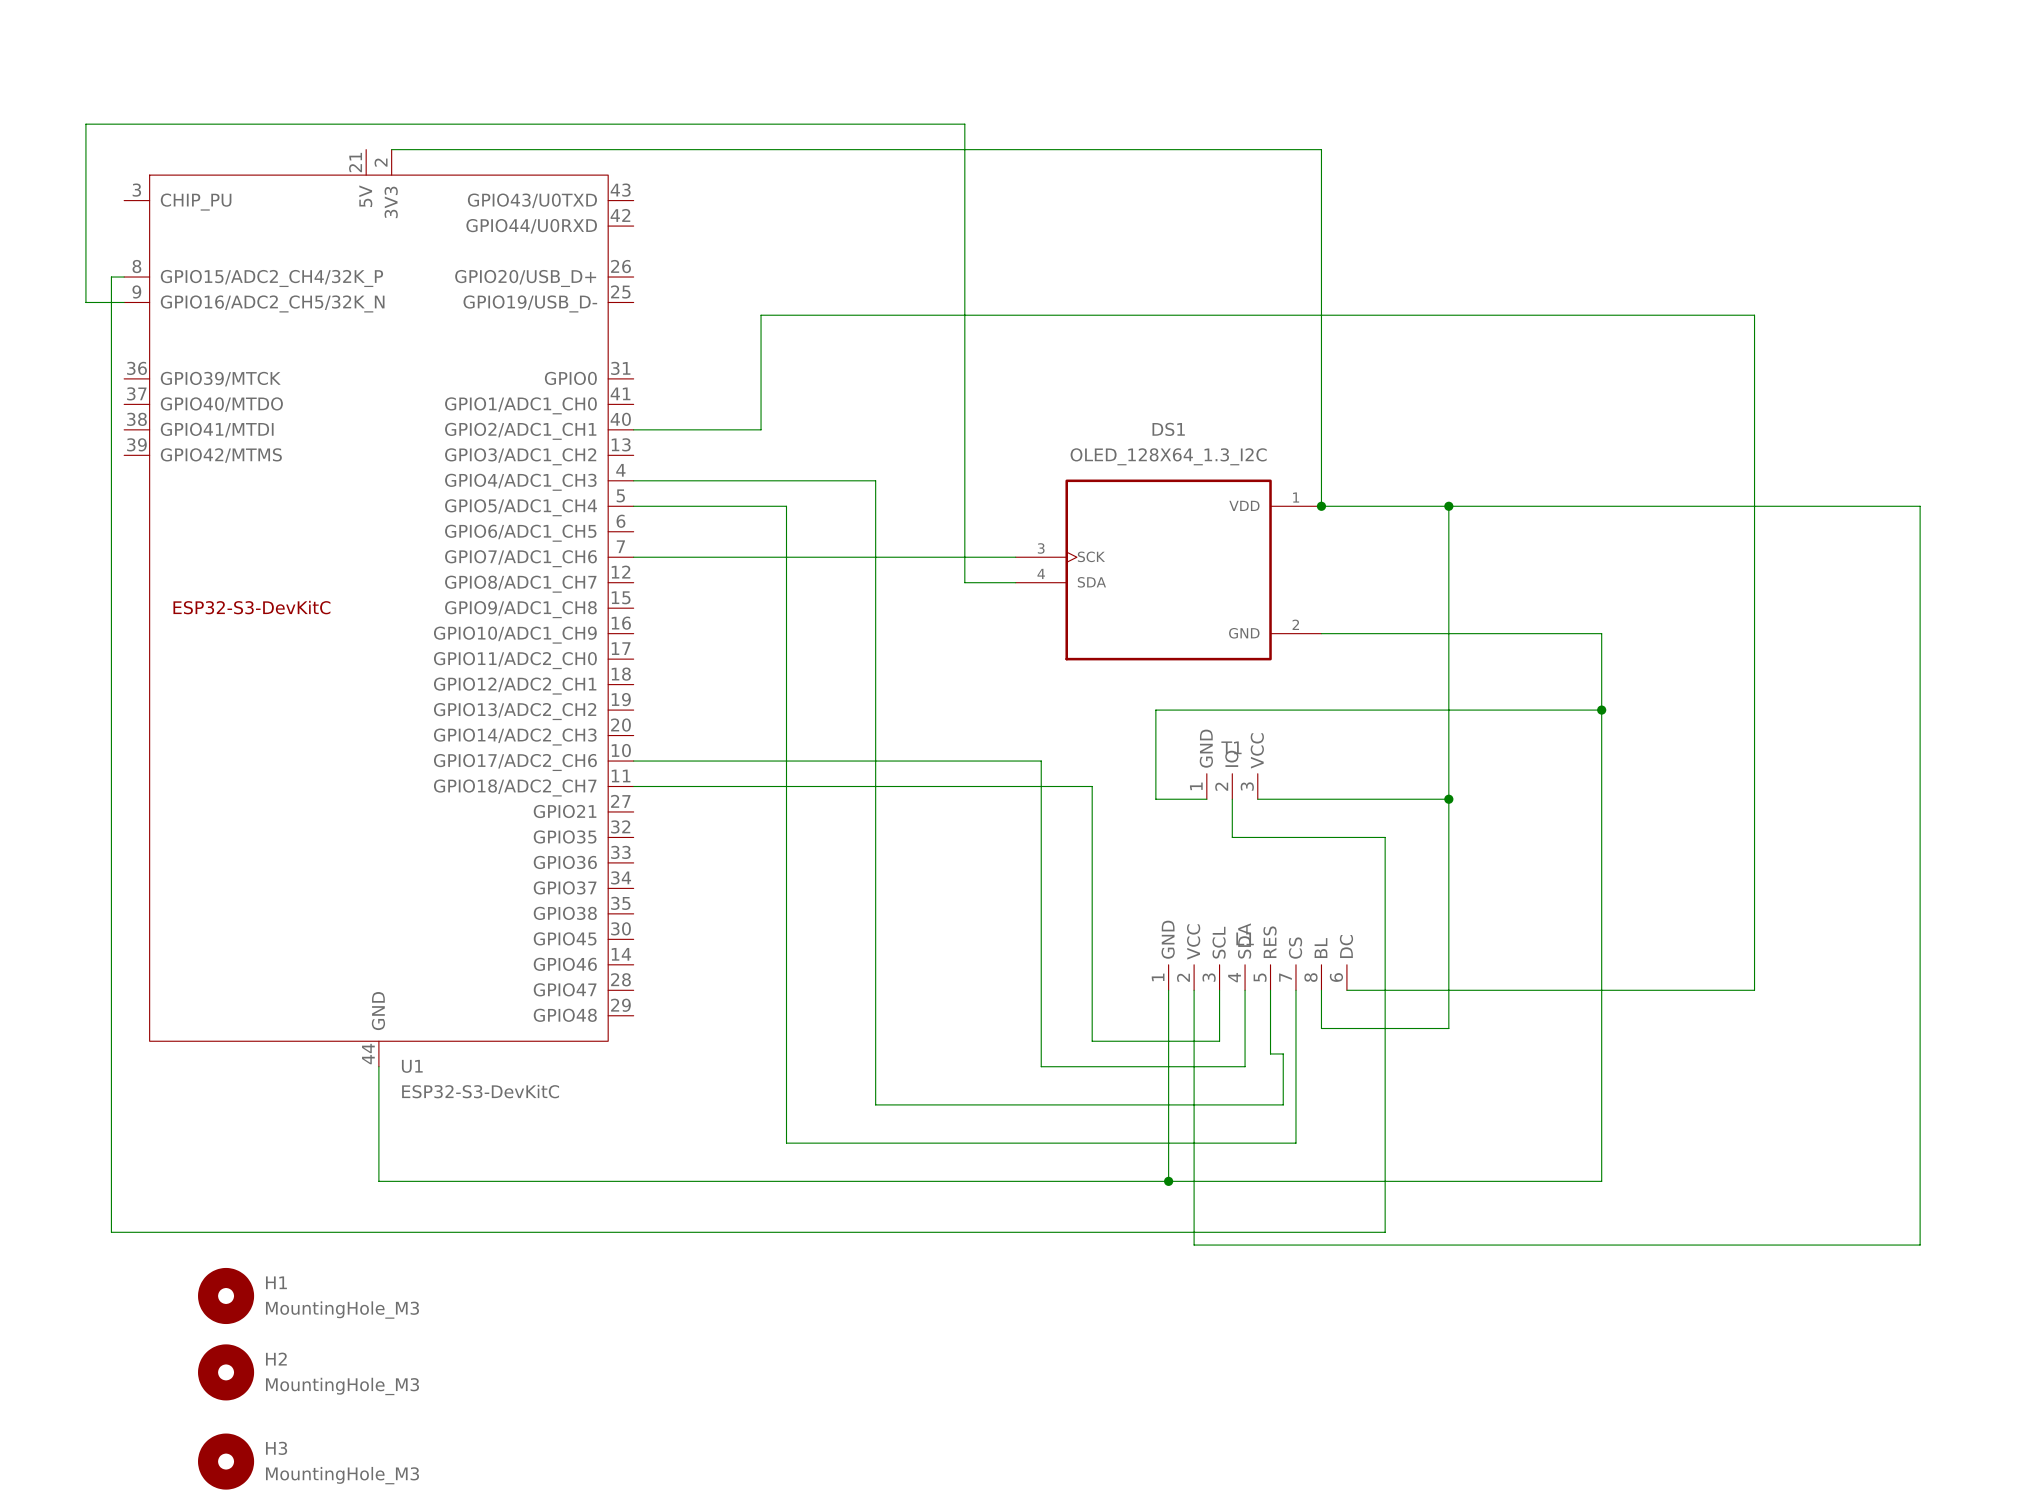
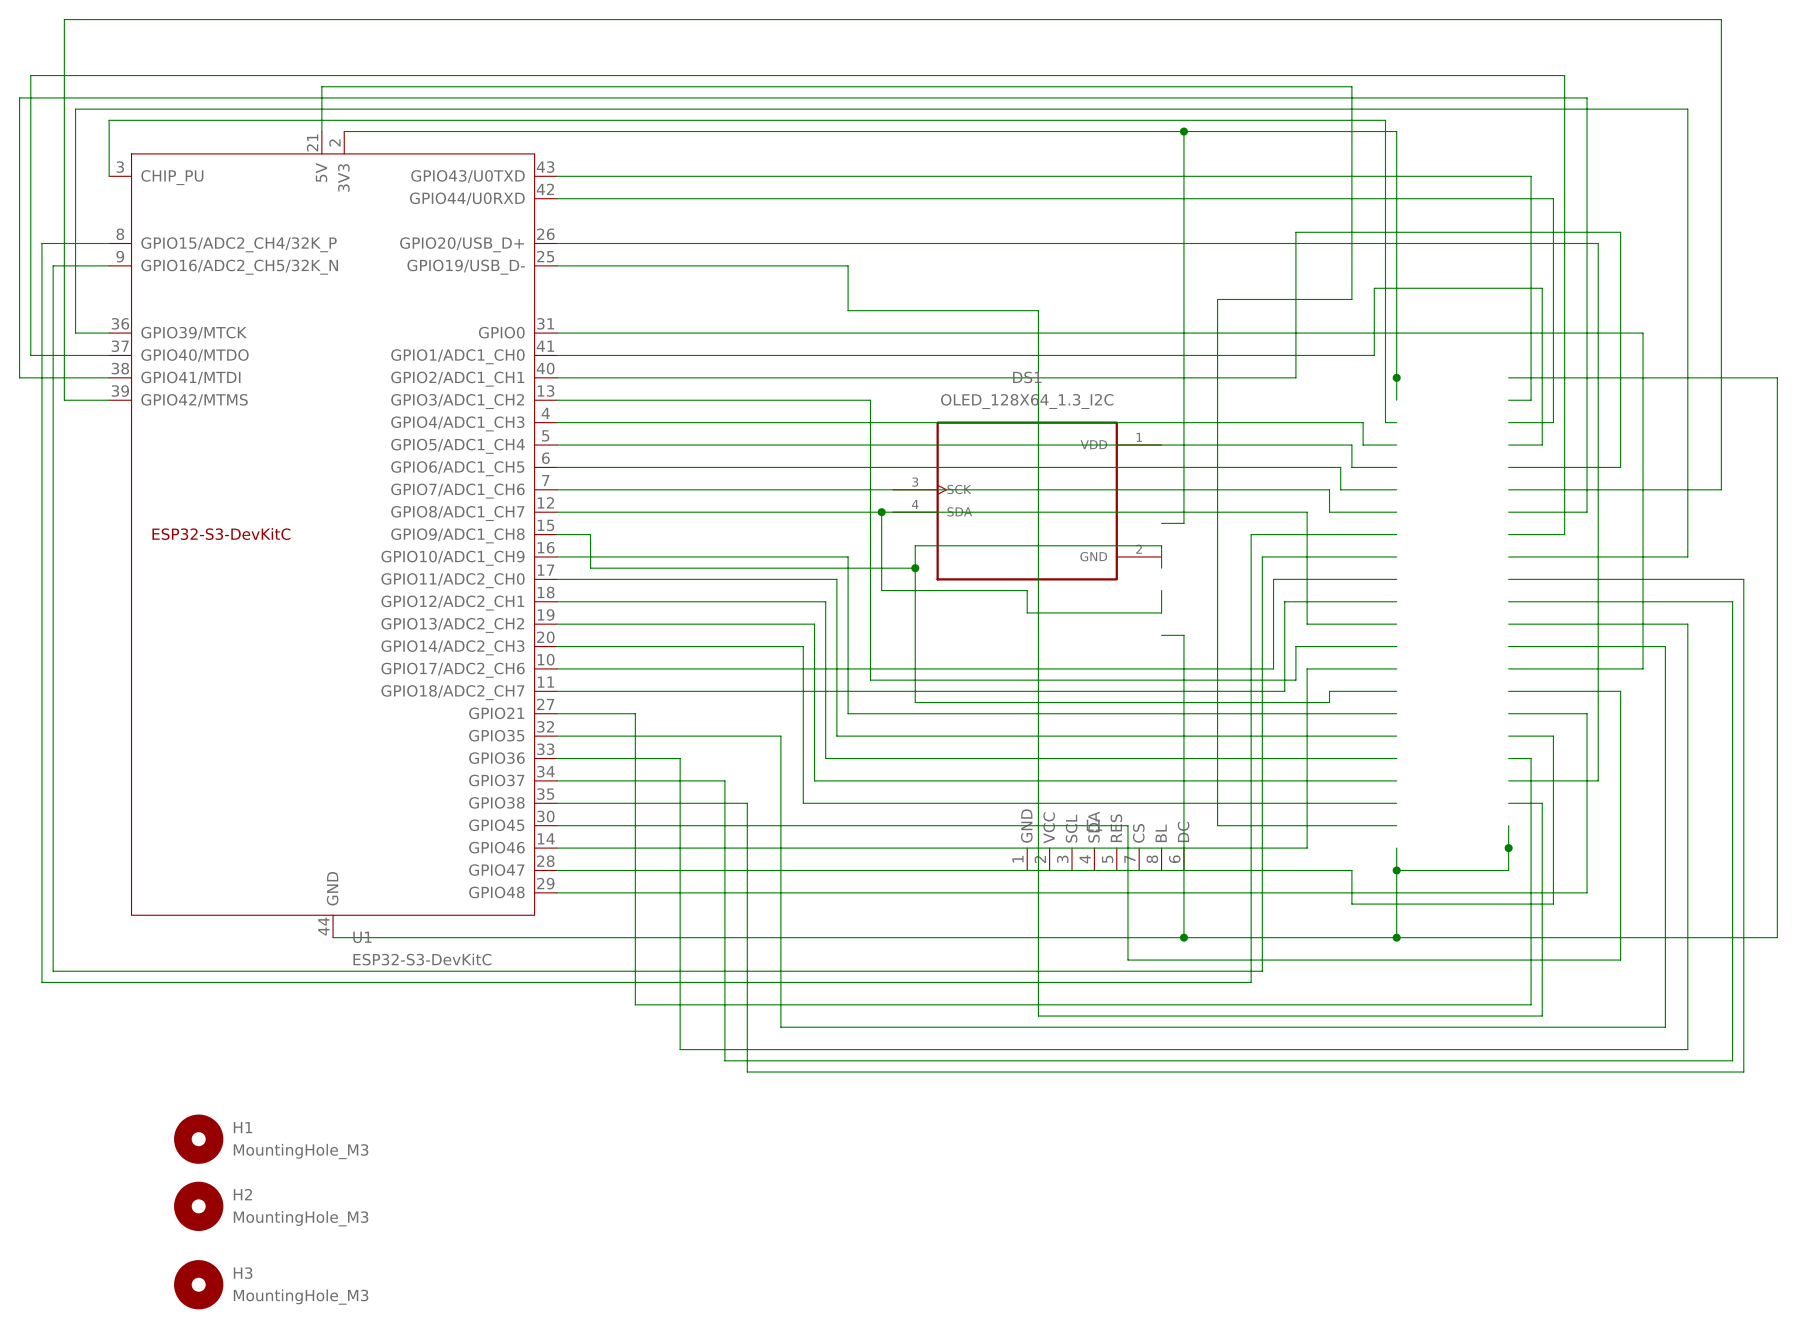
wire: (964, 124) (964, 302) -> (556, 265) (848, 265)
wire: none -> (848, 109) (1687, 109) (1687, 445)
wire: none -> (321, 131) (321, 86) (1351, 86) (1351, 299) (1217, 299) (1217, 736) (1396, 736)
wire: (1321, 149) (1321, 506) -> (1161, 131) (1396, 131) (1396, 400)
wire: none -> (1183, 131) (1183, 523) (1161, 523)
junction: none -> (1183, 131)
wire: none -> (109, 176) (109, 120) (1385, 120) (1385, 422) (1396, 422)
wire: none -> (556, 176) (1531, 176) (1531, 400) (1508, 400)
wire: none -> (556, 198) (1553, 198) (1553, 422) (1508, 422)
wire: (111, 277) (111, 1232) (1385, 1232) (1385, 939) -> (97, 243) (41, 243) (41, 982) (1251, 982) (1251, 534) (1396, 534)
wire: none -> (556, 243) (1598, 243) (1598, 780) (1508, 780)
wire: (1754, 327) (1754, 315) (761, 315) (761, 429) -> (1542, 288) (1374, 288) (1374, 355) (556, 355)
wire: (964, 353) (964, 582) -> (556, 512) (848, 512)
wire: none -> (848, 310) (1038, 310) (1038, 1016) (1542, 1016) (1542, 870)
wire: none -> (556, 333) (1643, 333) (1643, 668) (1508, 668)
wire: none -> (109, 355) (30, 355) (30, 75) (1564, 75) (1564, 534) (1508, 534)
wire: none -> (109, 377) (19, 377) (19, 97) (1587, 97) (1587, 512) (1508, 512)
wire: none -> (668, 377) (1295, 377) (1295, 232) (1620, 232) (1620, 467) (1508, 467)
junction: none -> (1396, 377)
wire: none -> (109, 400) (64, 400) (64, 19) (1721, 19) (1721, 489) (1508, 489)
wire: none -> (556, 400) (870, 400) (870, 680) (1295, 680) (1295, 646) (1396, 646)
wire: (875, 480) (875, 1104) -> (109, 333) (75, 333) (75, 265) (53, 265) (53, 971) (769, 971)
wire: none -> (769, 422) (1363, 422) (1363, 445)
wire: (786, 506) (786, 1143) -> (556, 713) (635, 713) (635, 1004) (691, 1004)
wire: none -> (691, 445) (1161, 445)
junction: (1321, 506) -> none
wire: (1448, 506) (1448, 659) -> (1396, 579) (1273, 579)
junction: (1448, 506) -> none
wire: (1537, 506) (1550, 506) -> (1351, 445) (1351, 467) (1396, 467)
wire: (1588, 506) (1716, 506) -> none
wire: (1920, 506) (1754, 506) (1754, 913) -> (1508, 803) (1542, 803)
wire: none -> (556, 467) (1340, 467) (1340, 489) (1396, 489)
wire: none -> (892, 489) (1329, 489) (1329, 512) (1396, 512)
wire: none -> (881, 512) (881, 590) (1027, 590) (1027, 612) (1161, 612) (1161, 590)
junction: none -> (881, 512)
wire: none -> (556, 534) (590, 534) (590, 568) (915, 568)
wire: none -> (556, 556) (848, 556) (848, 713) (1396, 713)
wire: (1321, 633) (1436, 633) -> (1127, 971) (1262, 971) (1262, 556)
wire: (1588, 633) (1601, 633) (1601, 1181) (378, 1181) (378, 1066) -> (915, 937) (333, 937)
wire: (1920, 633) (1920, 710) -> (1687, 556) (1508, 556)
junction: none -> (915, 568)
wire: none -> (1508, 579) (1743, 579) (1743, 1072) (747, 1072) (747, 803) (556, 803)
wire: none -> (556, 601) (825, 601) (825, 758) (1396, 758)
wire: none -> (1508, 601) (1732, 601) (1732, 1060) (724, 1060) (724, 780) (556, 780)
wire: none -> (556, 624) (814, 624) (814, 780) (1396, 780)
wire: (1487, 710) (1155, 710) (1155, 799) -> (1307, 624) (1307, 512) (892, 512)
wire: (1588, 710) (1601, 710) -> none
junction: (1601, 710) -> none
wire: none -> (1508, 624) (1687, 624)
wire: none -> (1161, 635) (1183, 635) (1183, 937)
wire: none -> (556, 646) (803, 646) (803, 803) (1396, 803)
wire: none -> (1508, 646) (1665, 646) (1665, 1027) (780, 1027) (780, 736) (556, 736)
wire: (1448, 761) (1448, 1028) (1321, 1028) (1321, 990) -> (1273, 668) (915, 668) (915, 545) (1161, 545) (1161, 568)
wire: none -> (1396, 668) (1307, 668) (1307, 848) (556, 848)
wire: (1092, 786) (1092, 1041) (1219, 1041) (1219, 990) -> (960, 691) (1284, 691) (1284, 601) (1396, 601)
T1: (1232, 786) -> none
wire: none -> (1396, 691) (1329, 691) (1329, 702) (1273, 702)
wire: (1041, 799) (1041, 1066) -> (915, 702) (1016, 702)
wire: none -> (1060, 702) (1105, 702)
wire: (1232, 799) (1232, 837) -> (556, 579) (836, 579) (836, 736) (1083, 736)
junction: (1448, 799) -> none
wire: none -> (1508, 713) (1587, 713) (1587, 892) (556, 892)
wire: none -> (1217, 825) (1396, 825)
wire: none -> (1396, 848) (1396, 937)
junction: none -> (1508, 848)
wire: none -> (556, 870) (1183, 870)
wire: (1168, 990) (1168, 1181) -> none
wire: (1194, 990) (1194, 1245) (1920, 1245) (1920, 1194) -> (556, 758) (680, 758) (680, 1049) (1687, 1049)
wire: (1245, 990) (1245, 1066) -> (1508, 377) (1777, 377) (1777, 937) (1094, 937)
wire: (1270, 990) (1270, 1053) (1283, 1053) -> (556, 825) (1127, 825) (1127, 926)
wire: (1295, 990) (1295, 1143) -> (1508, 758) (1531, 758) (1531, 1004) (1139, 1004)
wire: (1537, 990) (1588, 990) -> (1351, 870) (1351, 904) (1553, 904) (1553, 736) (1508, 736)
junction: none -> (1396, 870)
wire: (1716, 990) (1754, 990) -> (1508, 870) (1508, 825)
junction: none -> (1183, 937)
junction: none -> (1396, 937)
wire: (1283, 1092) (1283, 1104) -> (1127, 960) (1620, 960) (1620, 691) (1508, 691)
junction: (1168, 1181) -> none

